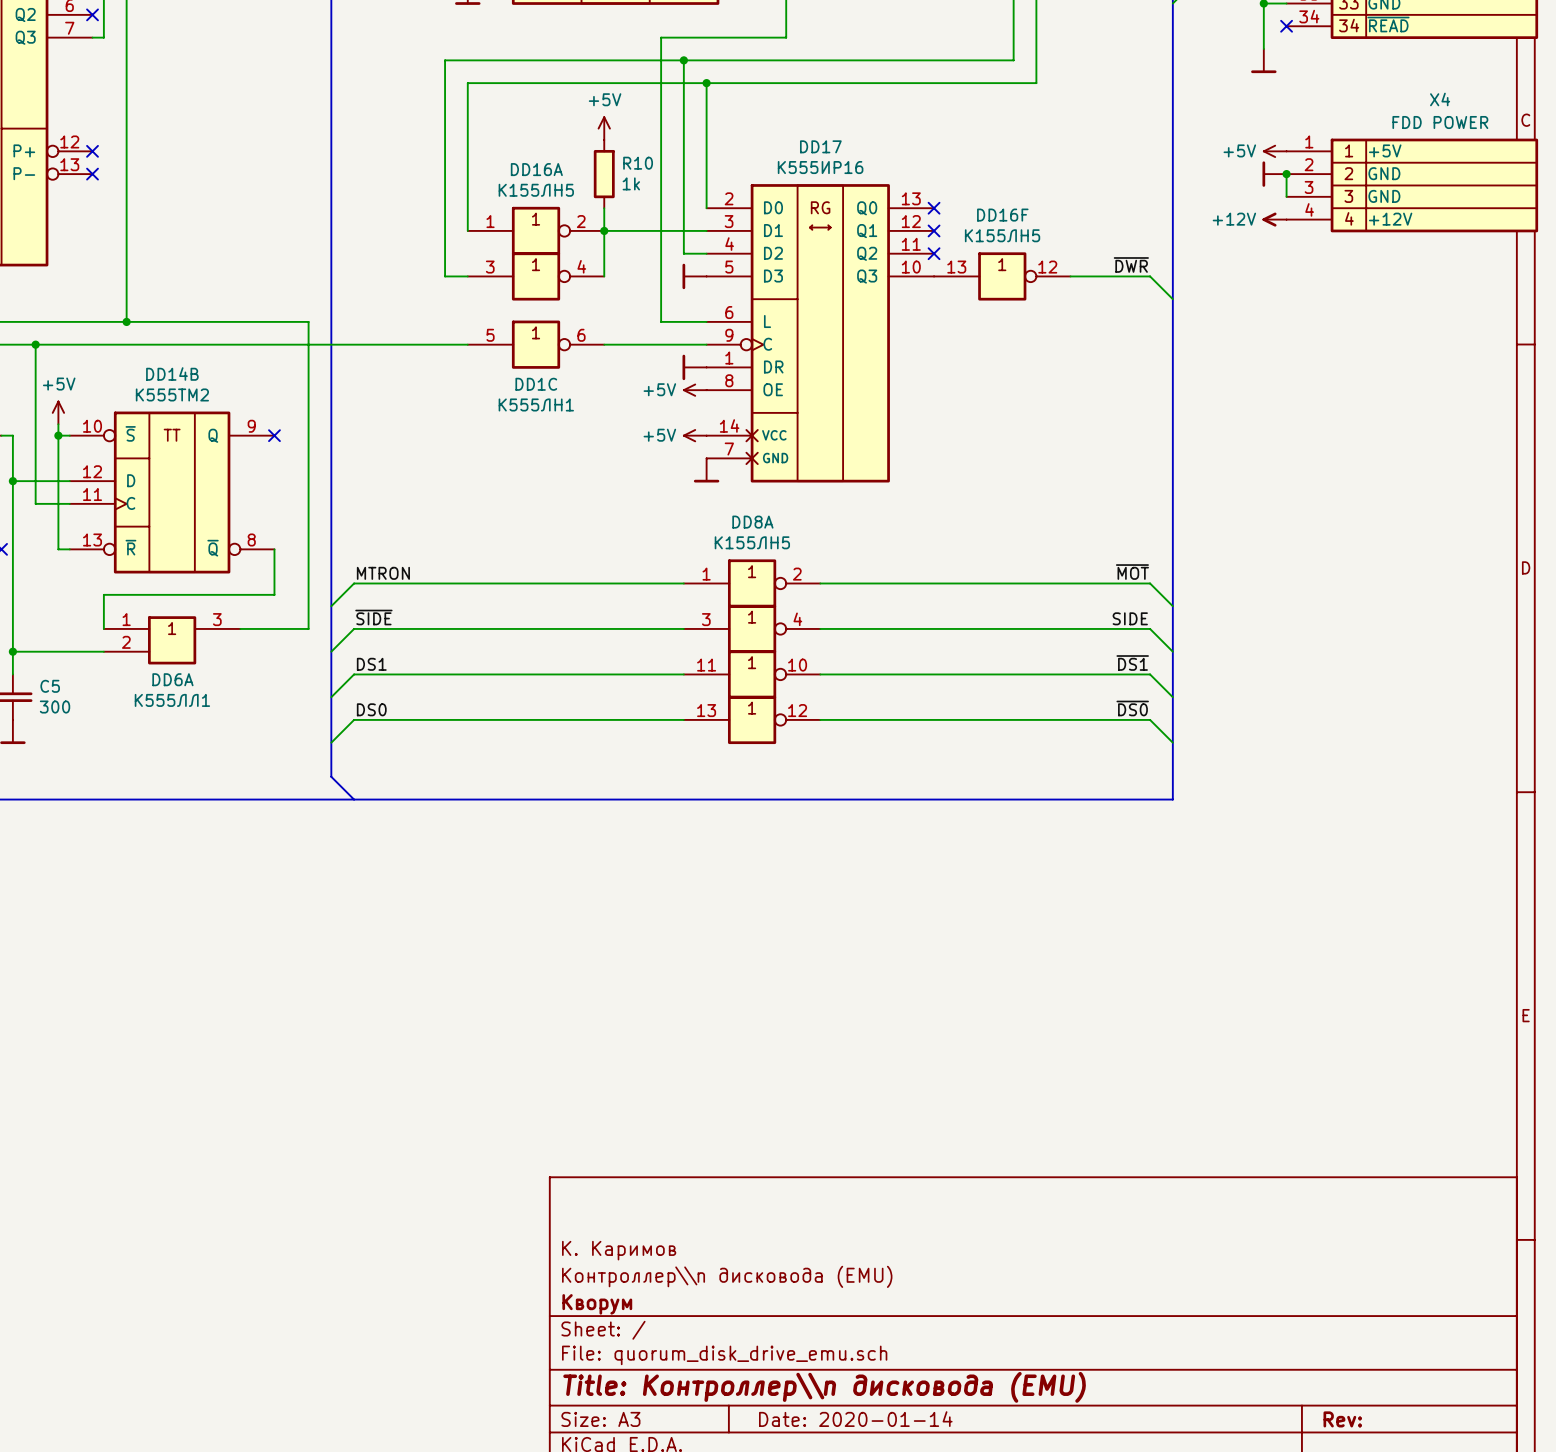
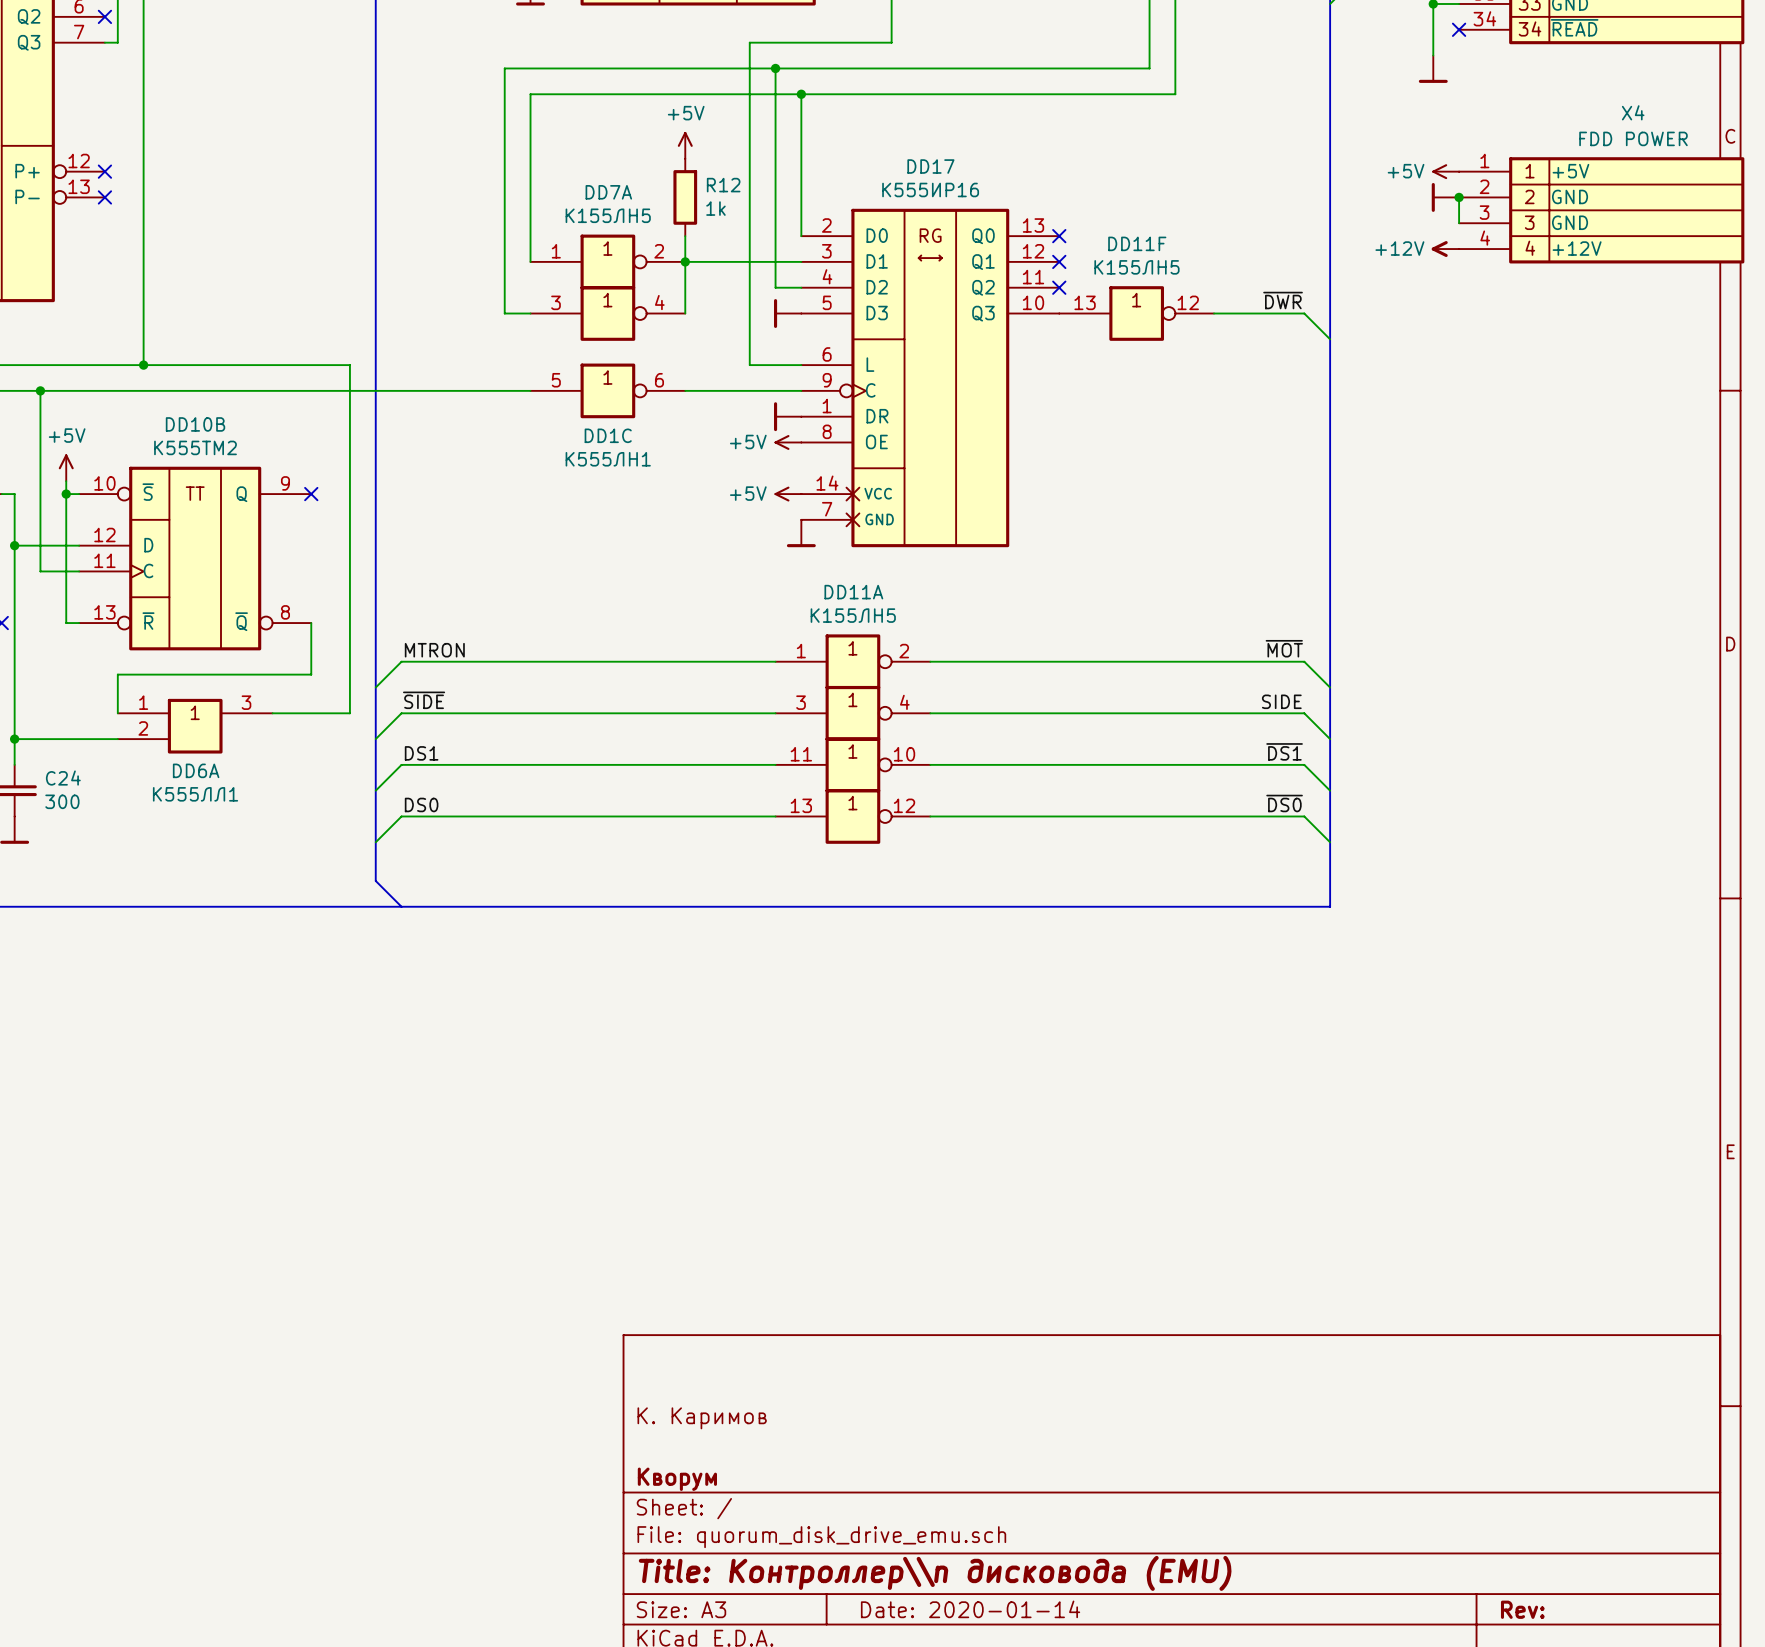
R10 name: R10 (638, 163) -> R12 (723, 185)
DD16A name: DD16A (536, 169) -> DD7A (608, 192)
DD16F name: DD16F (1002, 215) -> DD11F (1137, 243)
DD14B name: DD14B (172, 374) -> DD10B (195, 424)
DD8A name: DD8A (752, 522) -> DD11A (853, 592)
C5 name: C5 (50, 686) -> C24 (63, 778)
title block: Контроллер\\n дисковода (EMU) (727, 1276) -> none

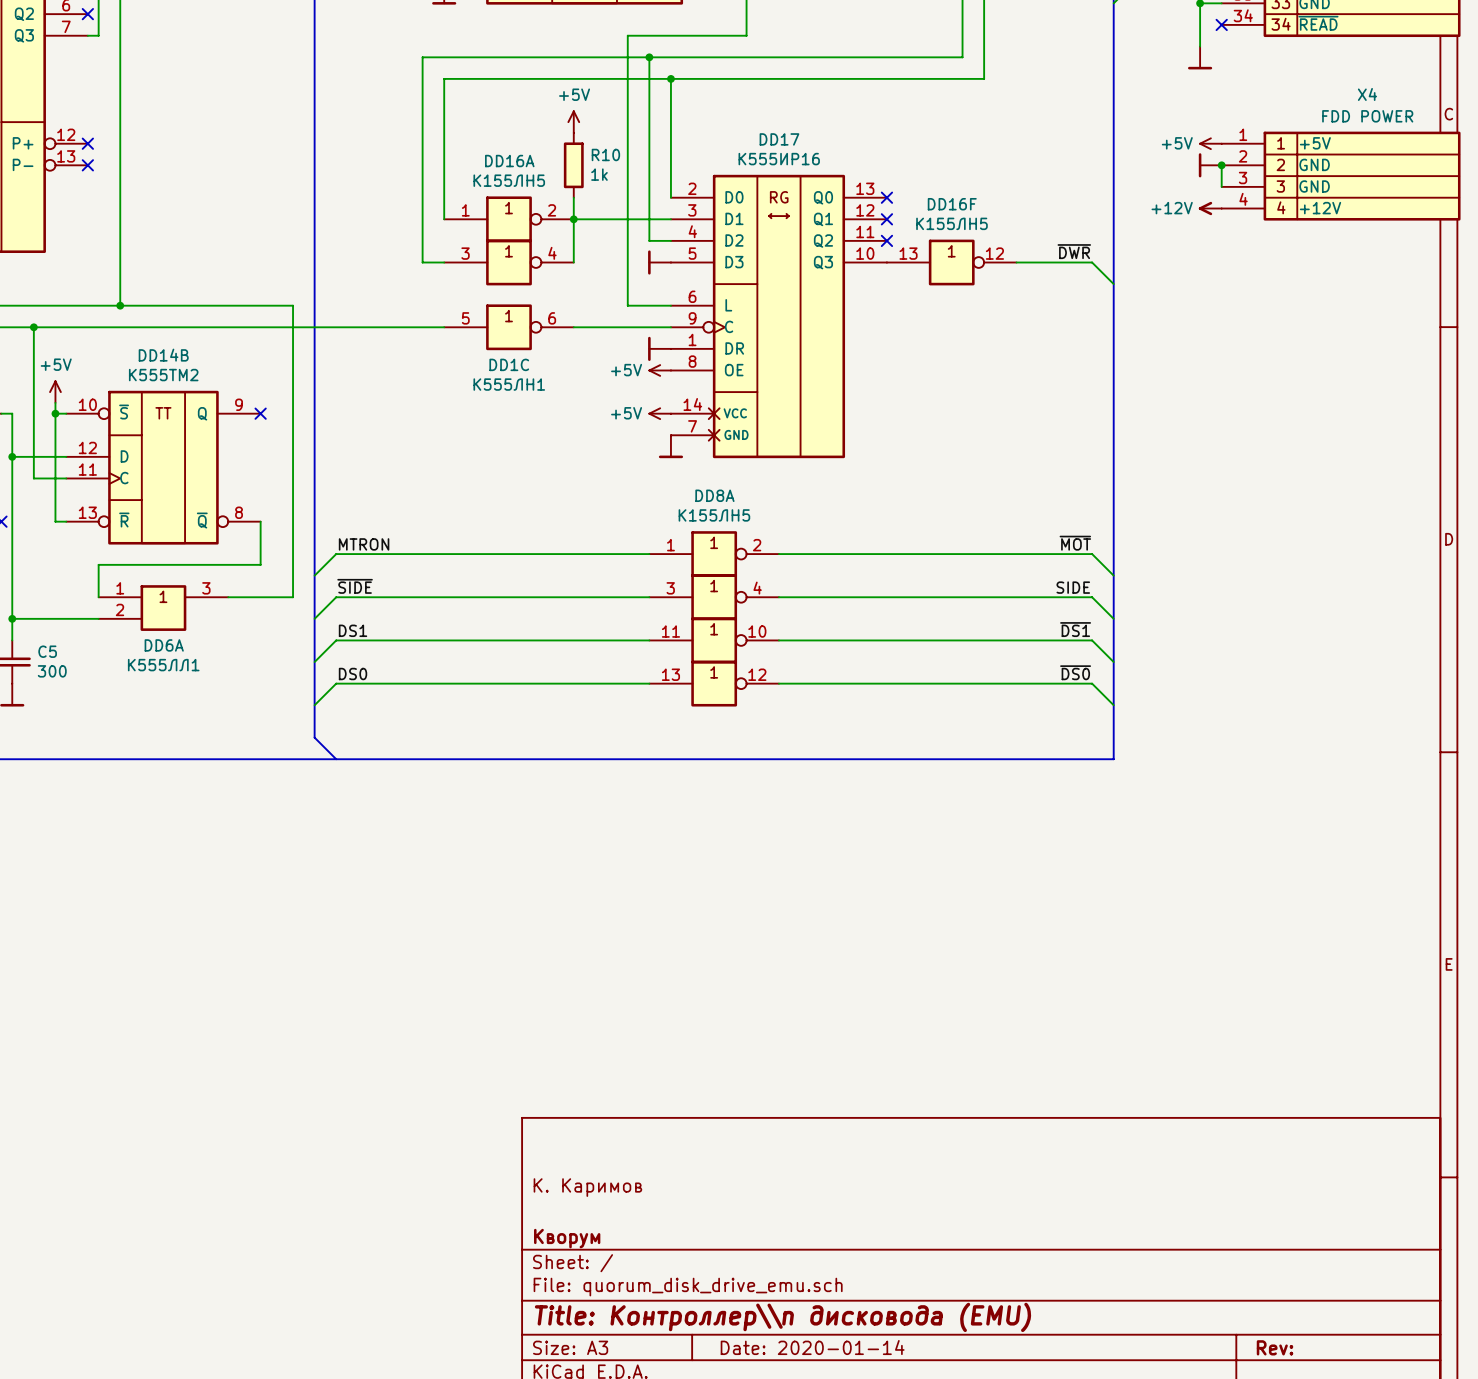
R12 name: R12 (723, 185) -> R10 (605, 154)
DD7A name: DD7A (608, 192) -> DD16A (509, 161)
DD11F name: DD11F (1137, 243) -> DD16F (952, 204)
DD10B name: DD10B (195, 424) -> DD14B (163, 355)
DD11A name: DD11A (853, 592) -> DD8A (714, 495)
C24 name: C24 (63, 778) -> C5 (47, 651)

